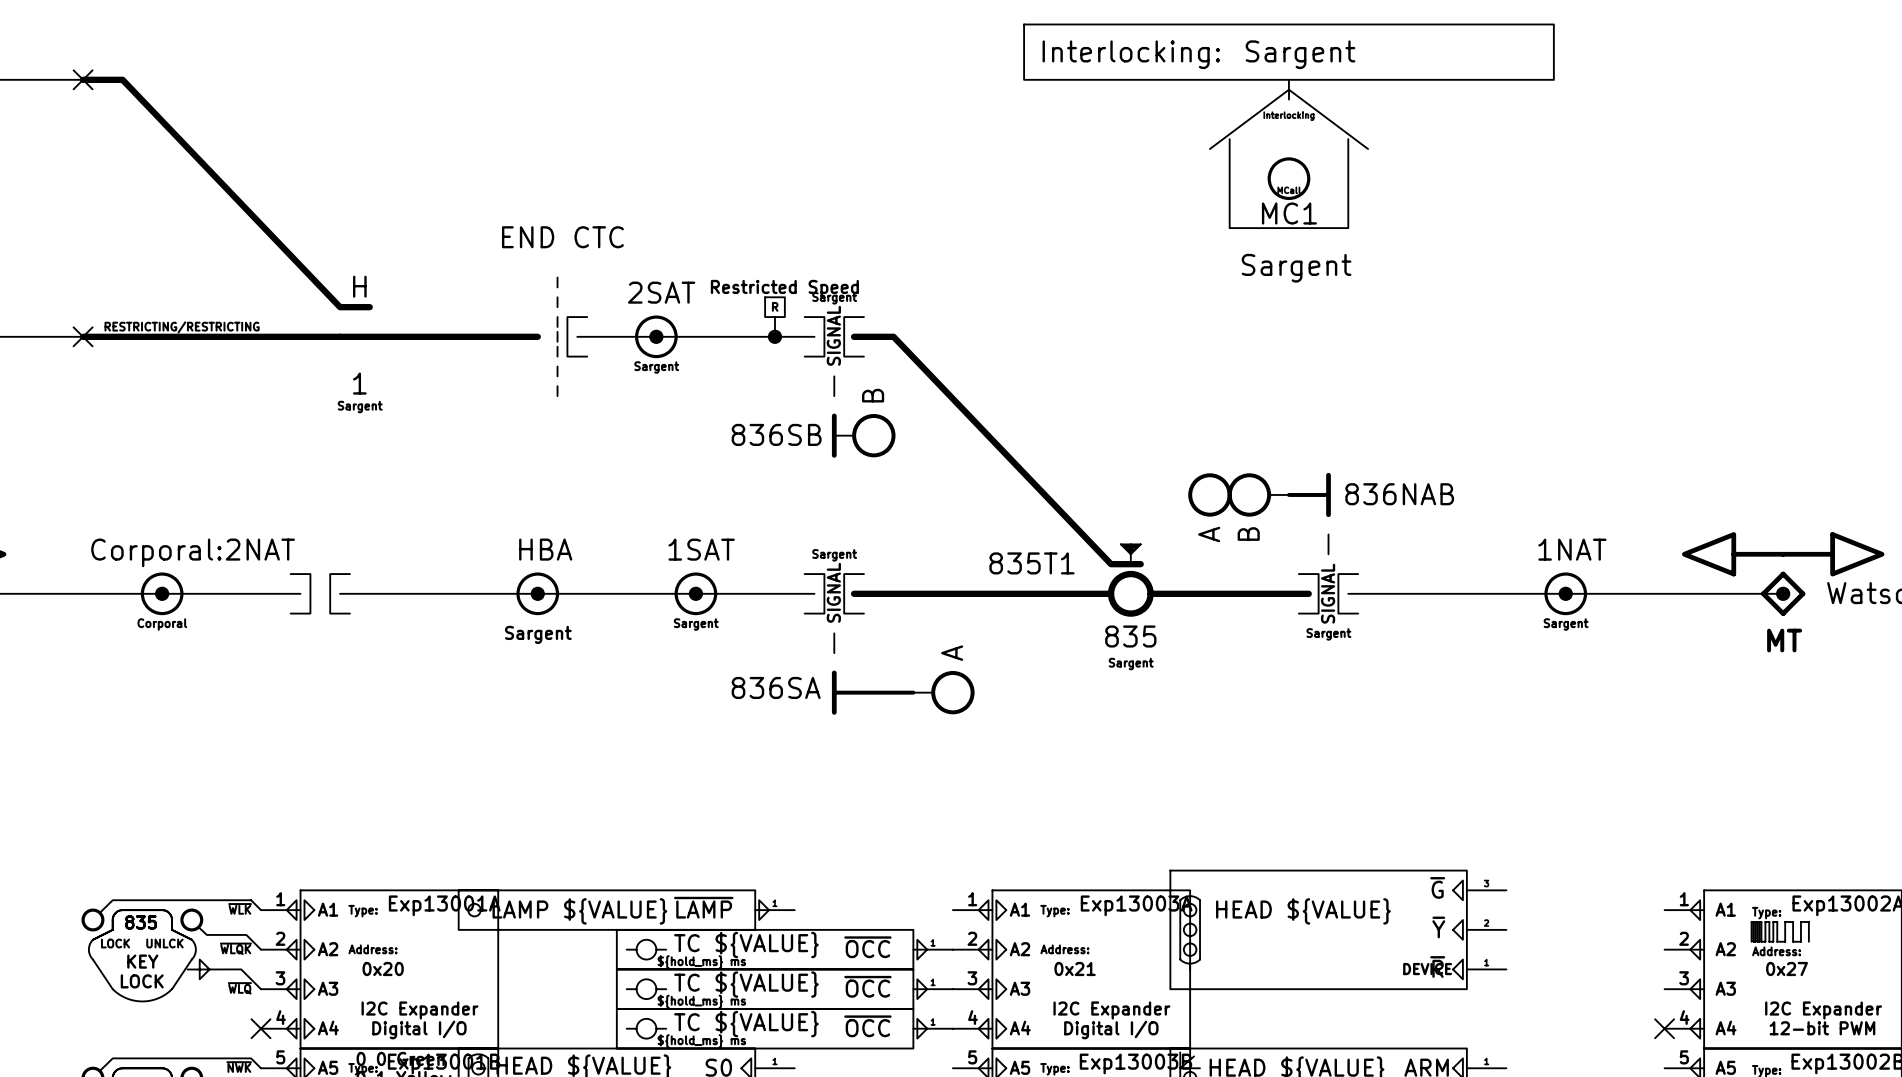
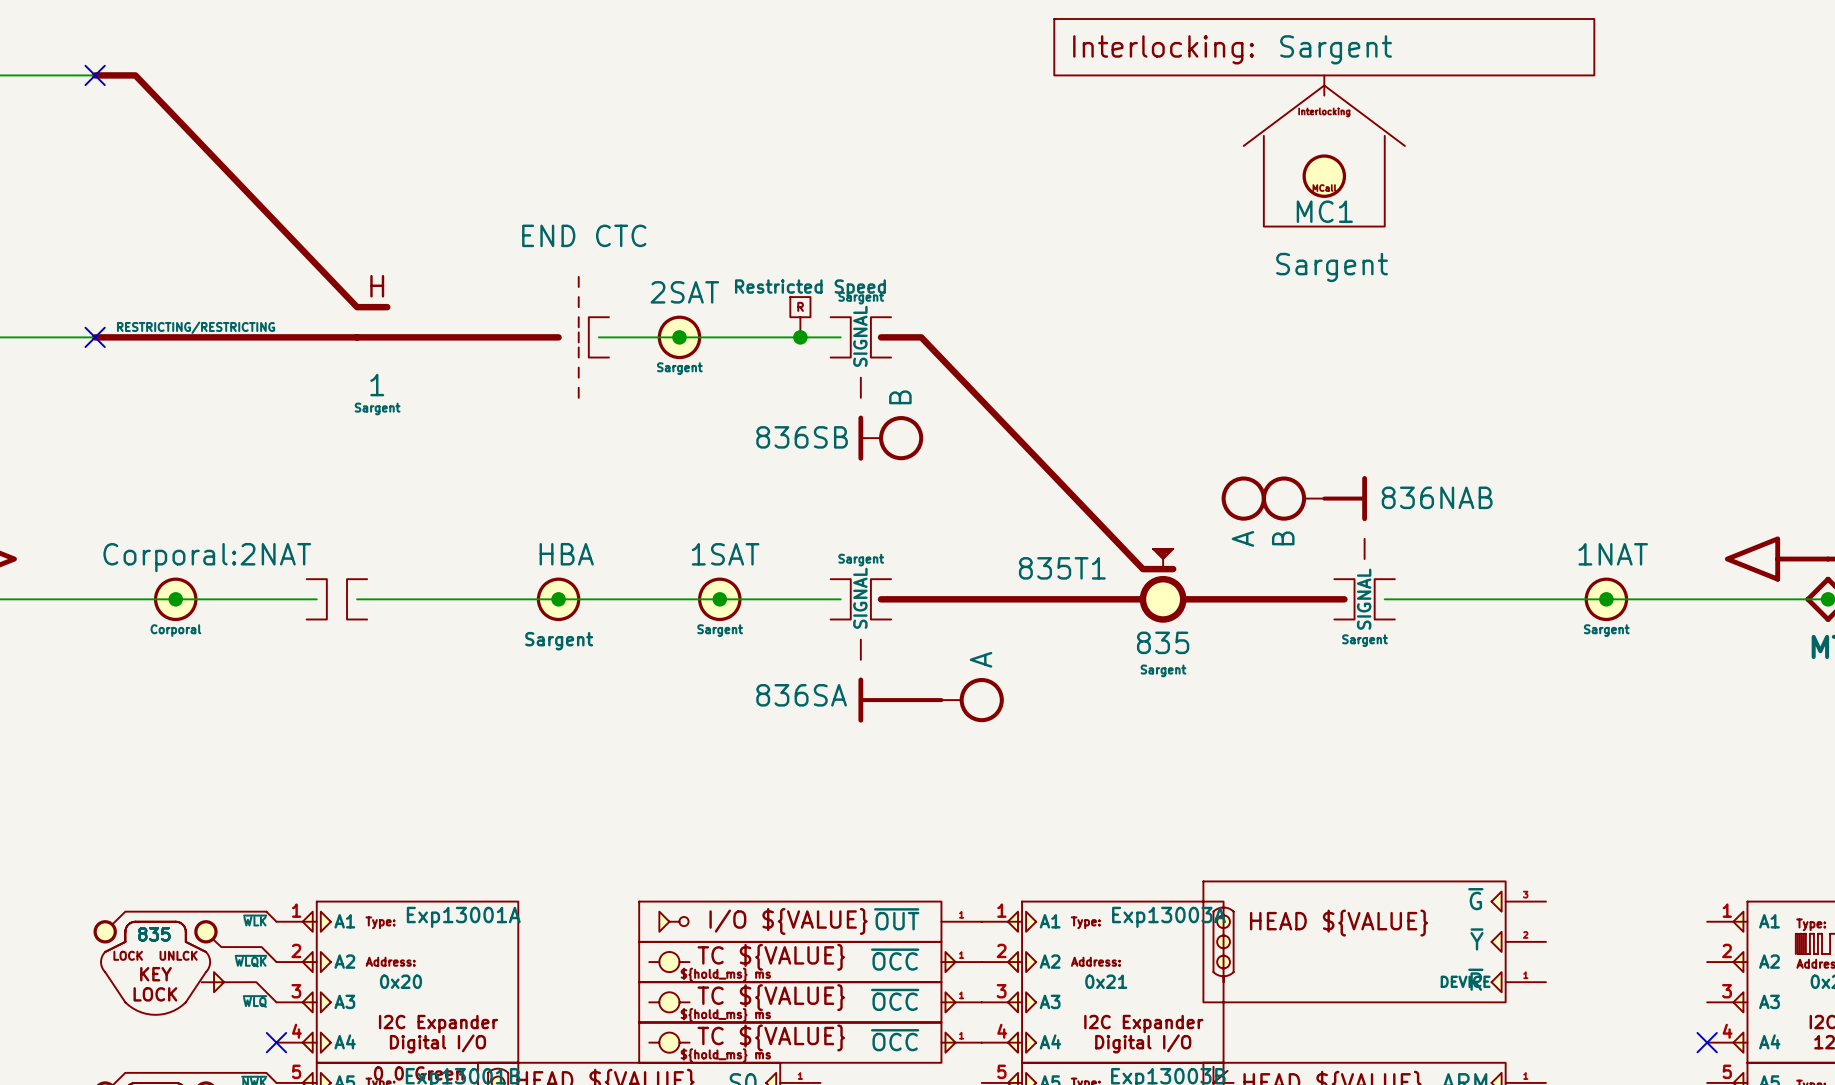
part: (626, 910) -> none
part: none -> (810, 921)

